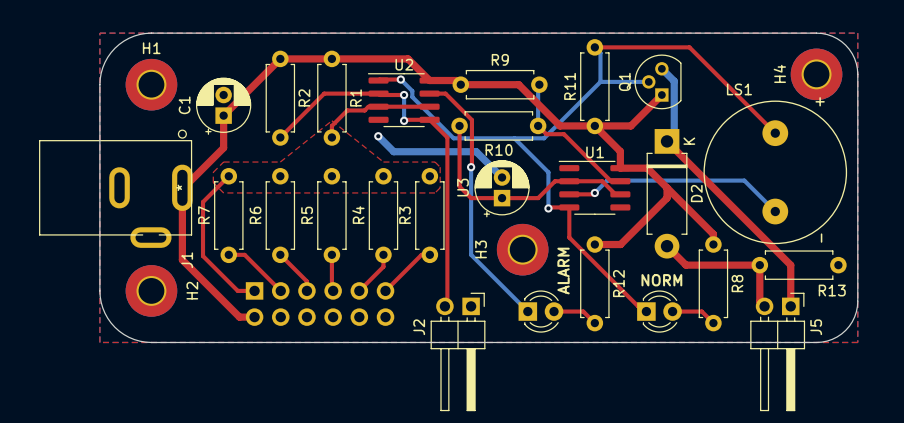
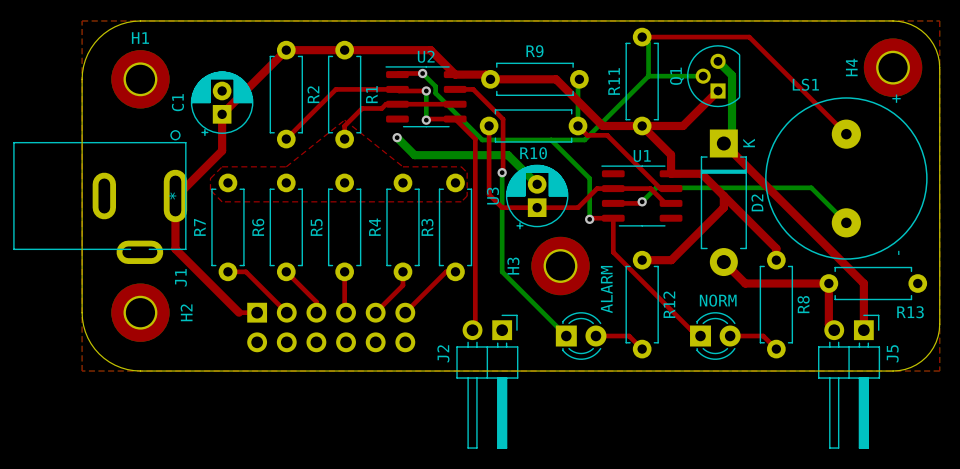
top track: (228, 176) (203, 202) (203, 256) (238, 290) -> none
top track: (182, 234) (182, 259) (239, 317) (254, 317) -> (175, 249) (239, 312)

